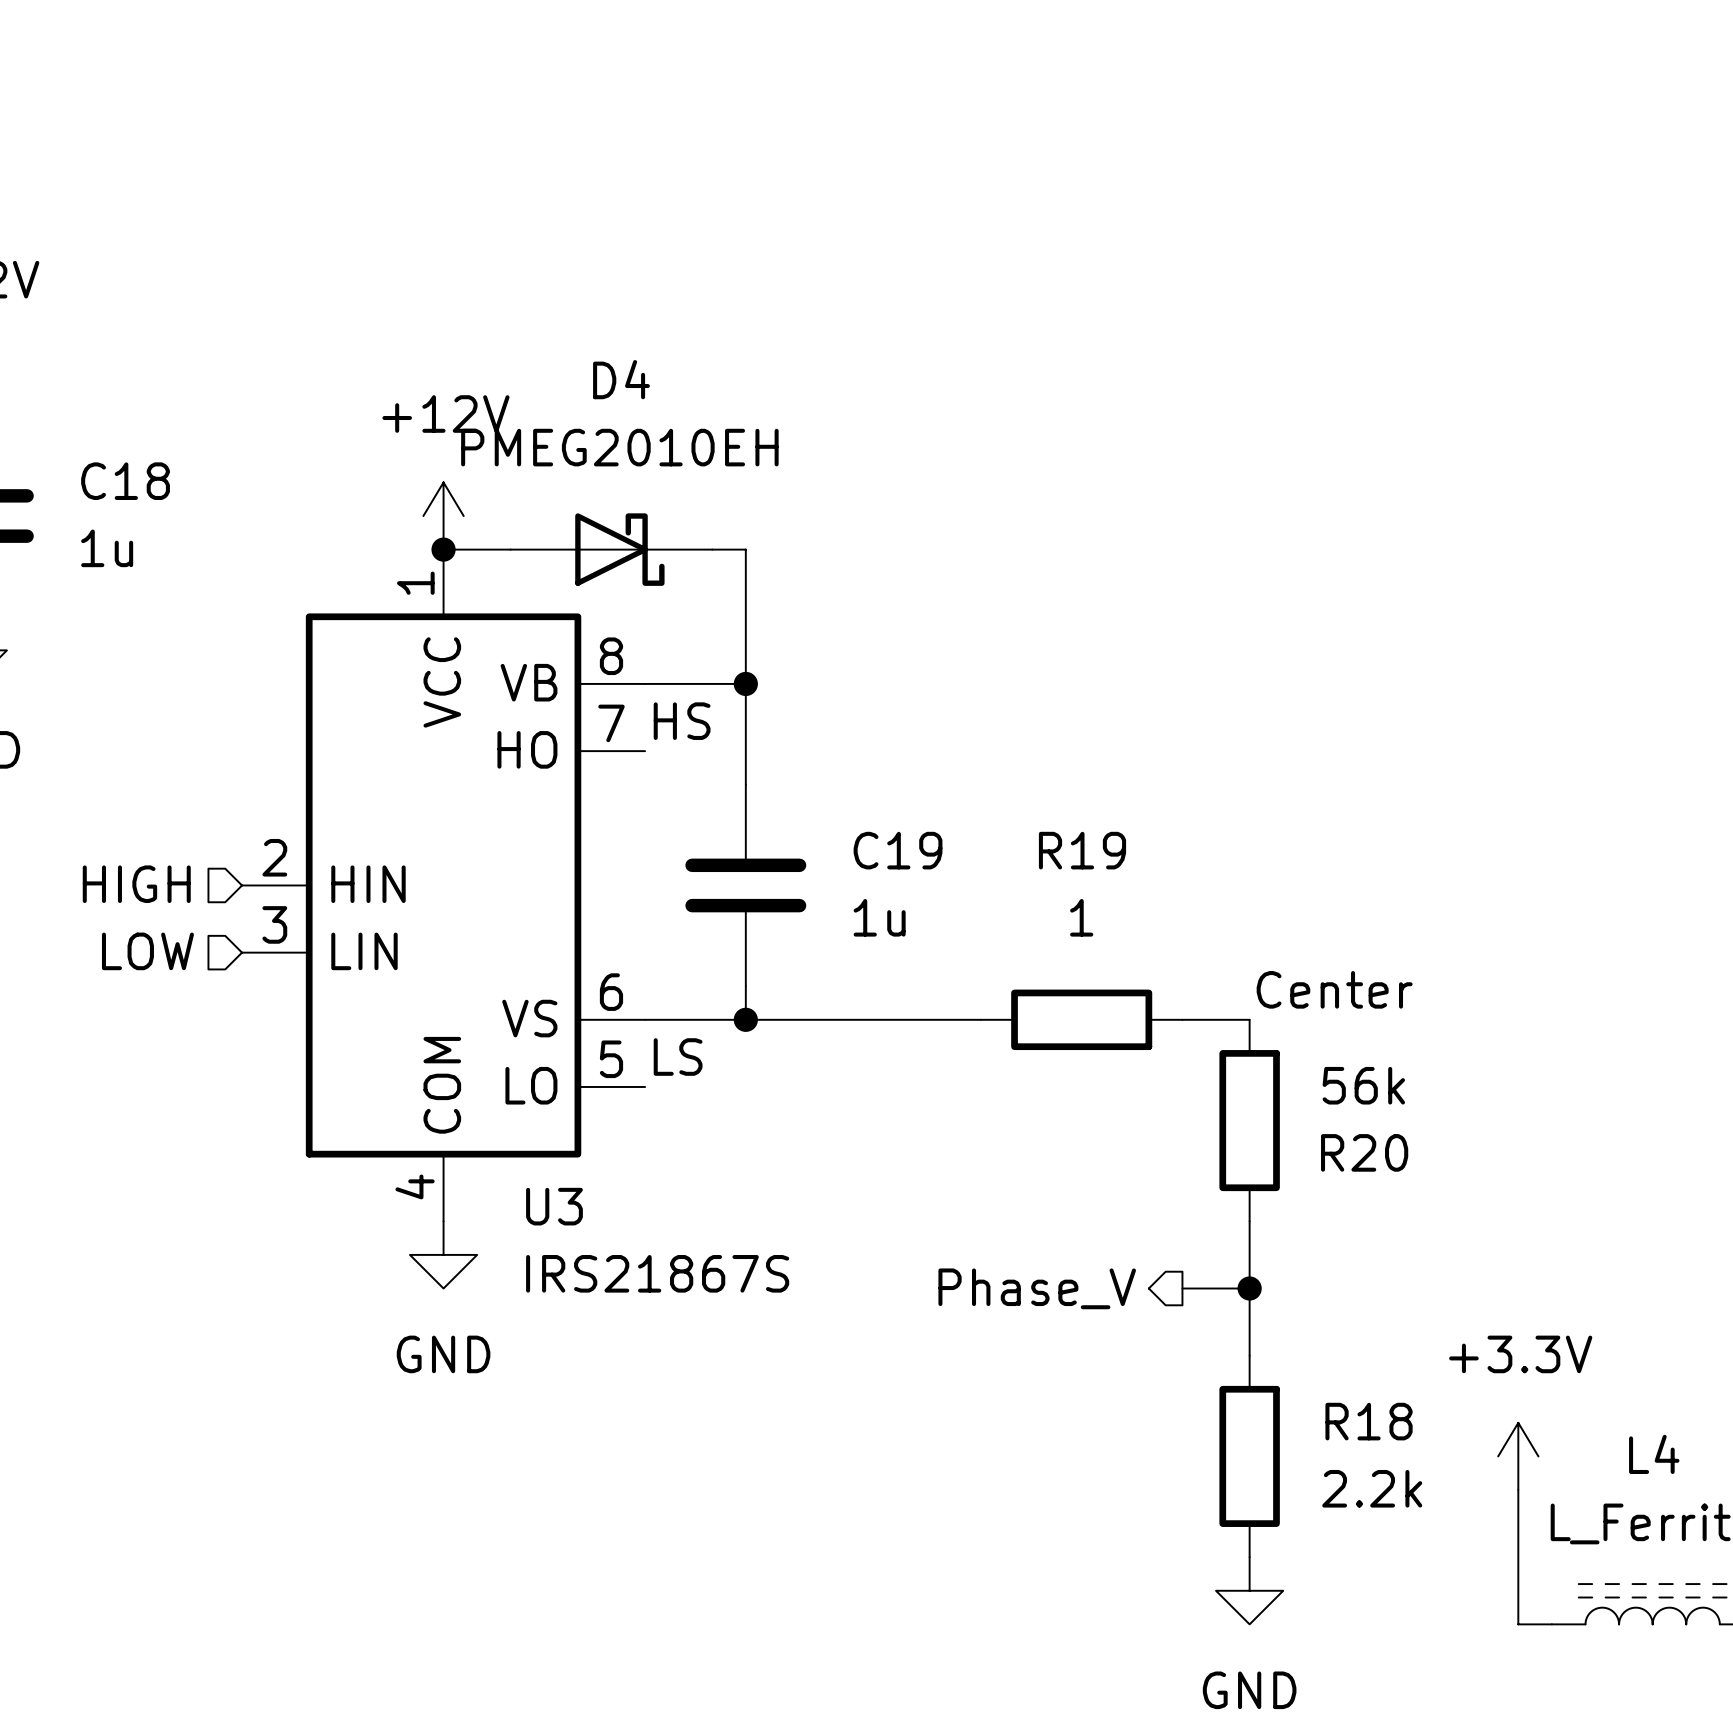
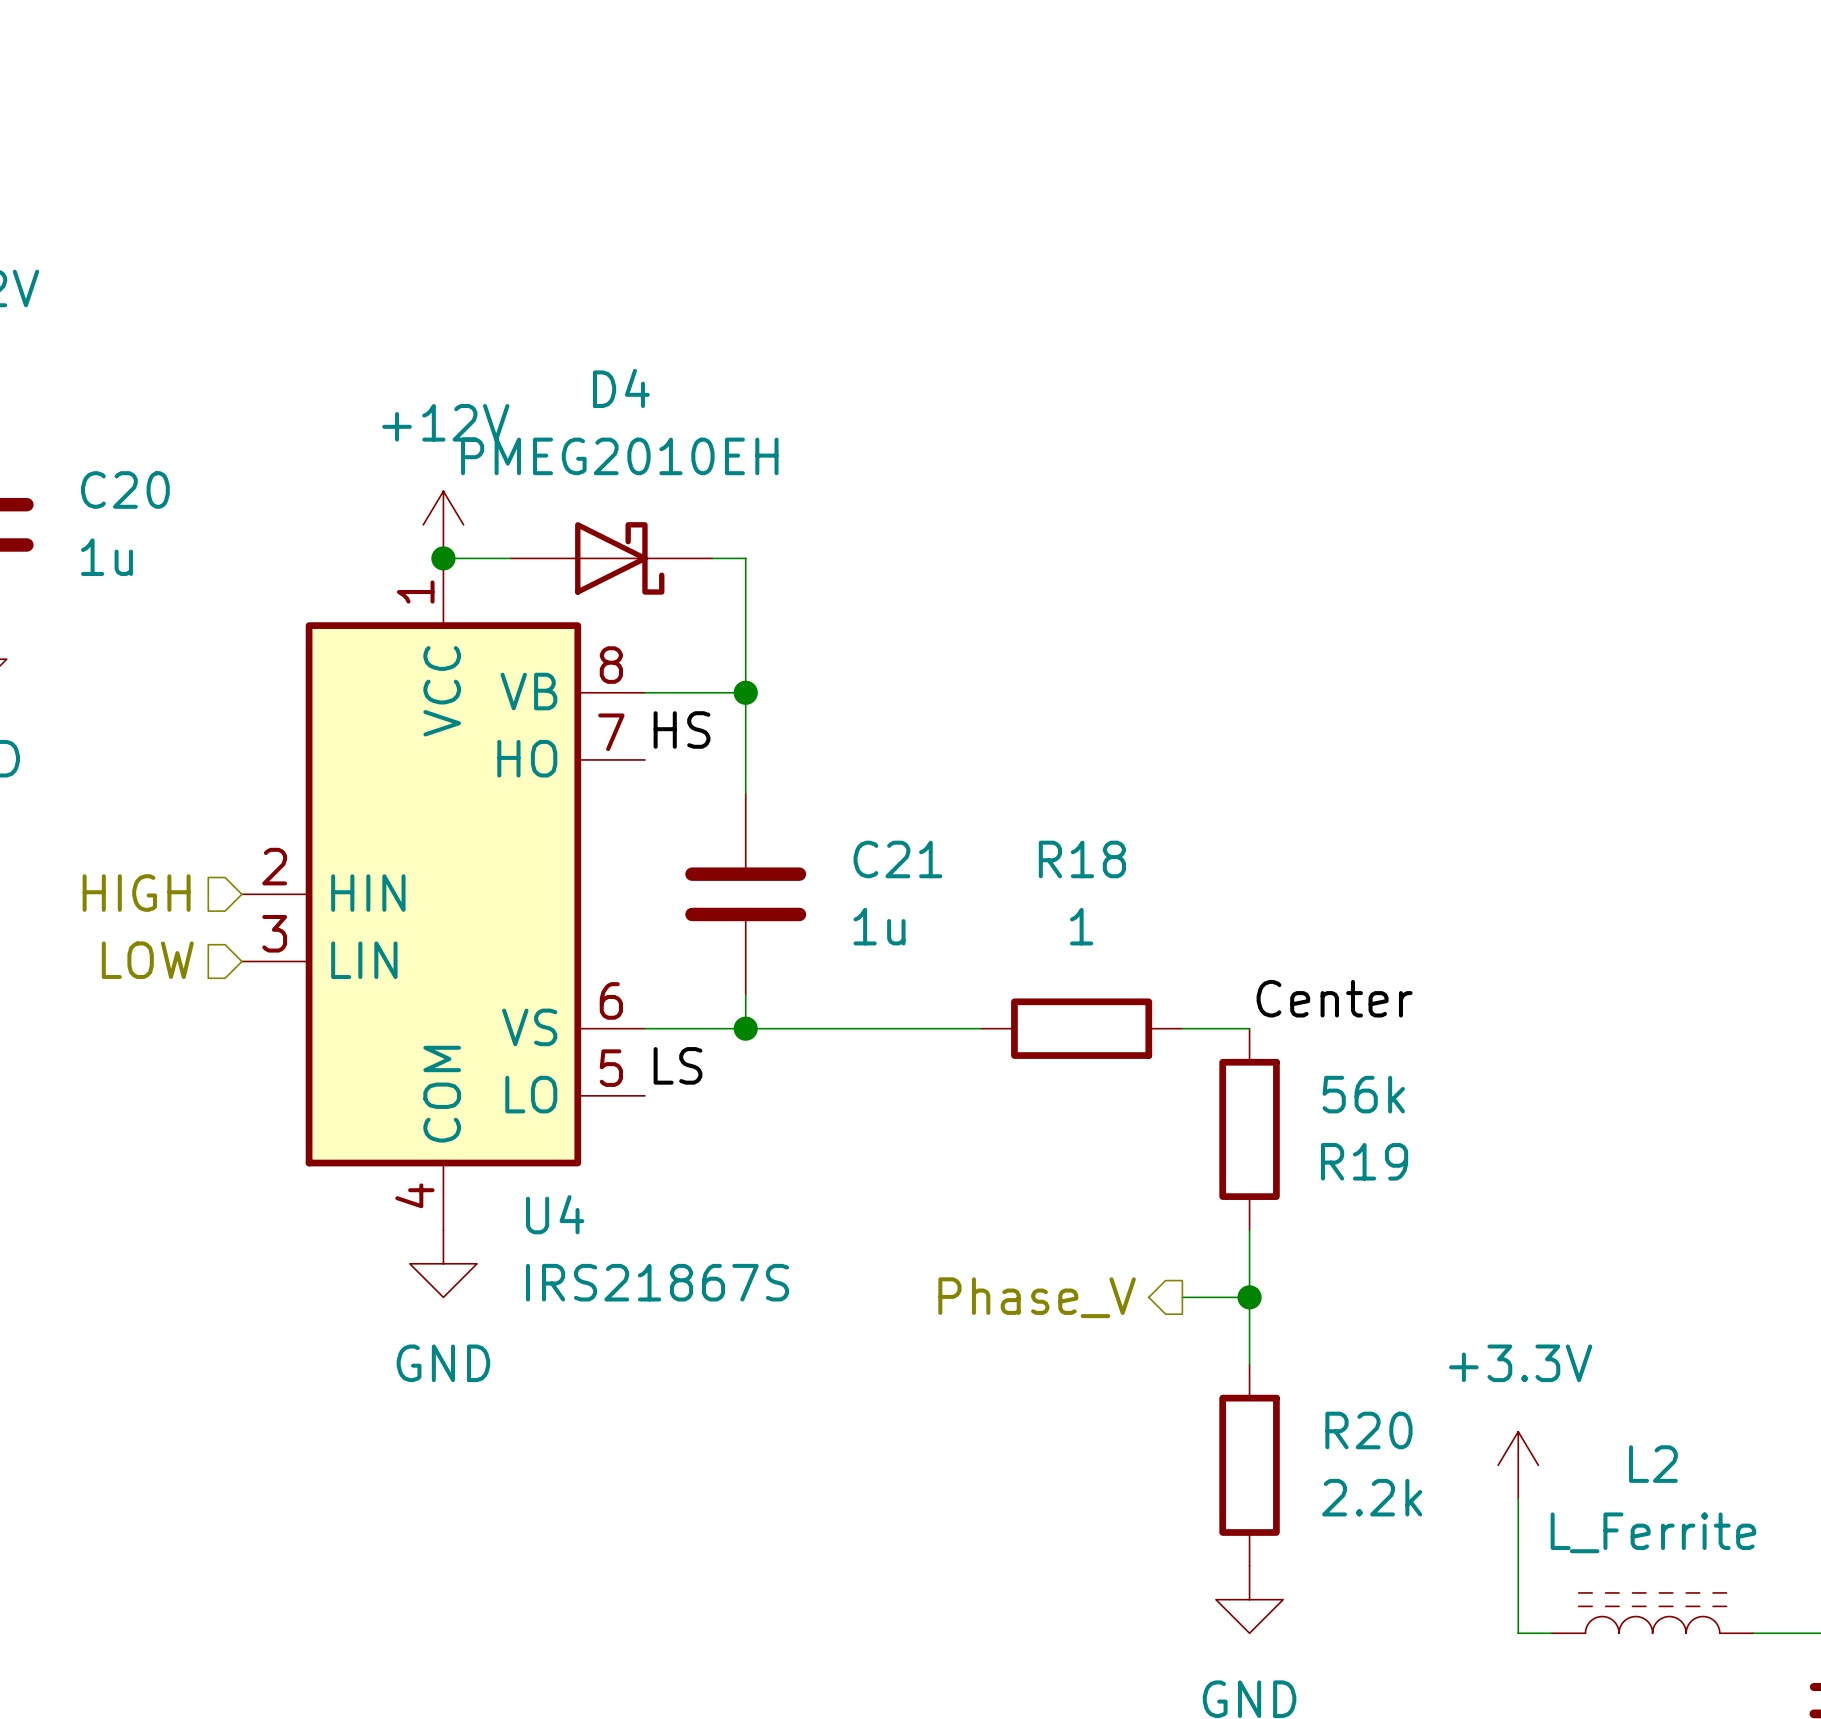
C18 name: C18 (125, 481) -> C20 (125, 489)
C19 name: C19 (898, 850) -> C21 (897, 859)
R19 name: R19 (1082, 850) -> R18 (1082, 859)
R20 name: R20 (1364, 1152) -> R19 (1364, 1161)
U3 name: U3 (554, 1206) -> U4 (555, 1214)
R18 name: R18 (1369, 1421) -> R20 (1368, 1430)
L4 name: L4 (1654, 1454) -> L2 (1653, 1464)

